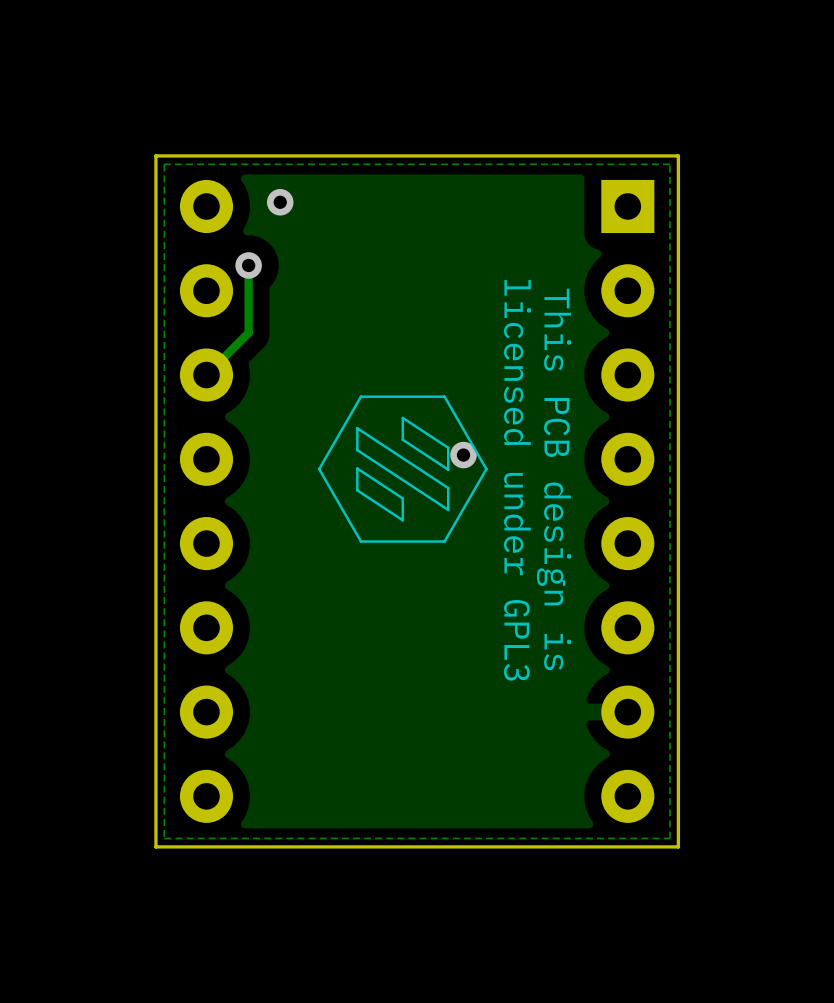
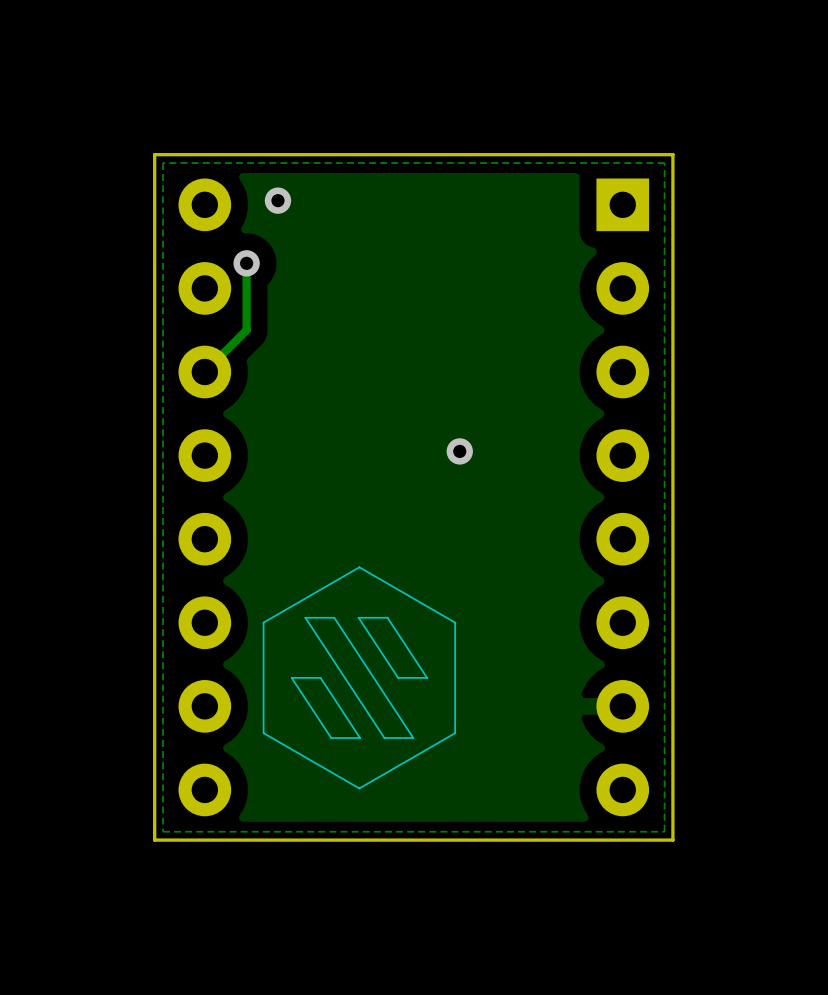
line: (444, 396) (486, 469) (444, 541) (360, 541) (319, 469) (360, 396) (444, 396) -> none
line: (402, 417) (448, 447) (448, 469) (402, 439) (402, 417) -> none
line: (357, 428) (357, 450) (448, 509) (448, 488) (357, 428) -> none
line: (357, 468) (357, 490) (402, 520) (402, 498) (357, 468) -> none
text: This PCB design is (554, 479) -> none
text: licensed under GPL3 (517, 480) -> none
line: none -> (359, 567) (455, 622) (455, 733) (359, 788) (263, 733) (263, 622) (359, 567)
line: none -> (334, 617) (413, 737) (384, 737) (305, 617) (334, 617)
line: none -> (387, 617) (358, 617) (398, 677) (427, 677) (387, 617)
line: none -> (320, 677) (291, 677) (331, 737) (360, 737) (320, 677)

